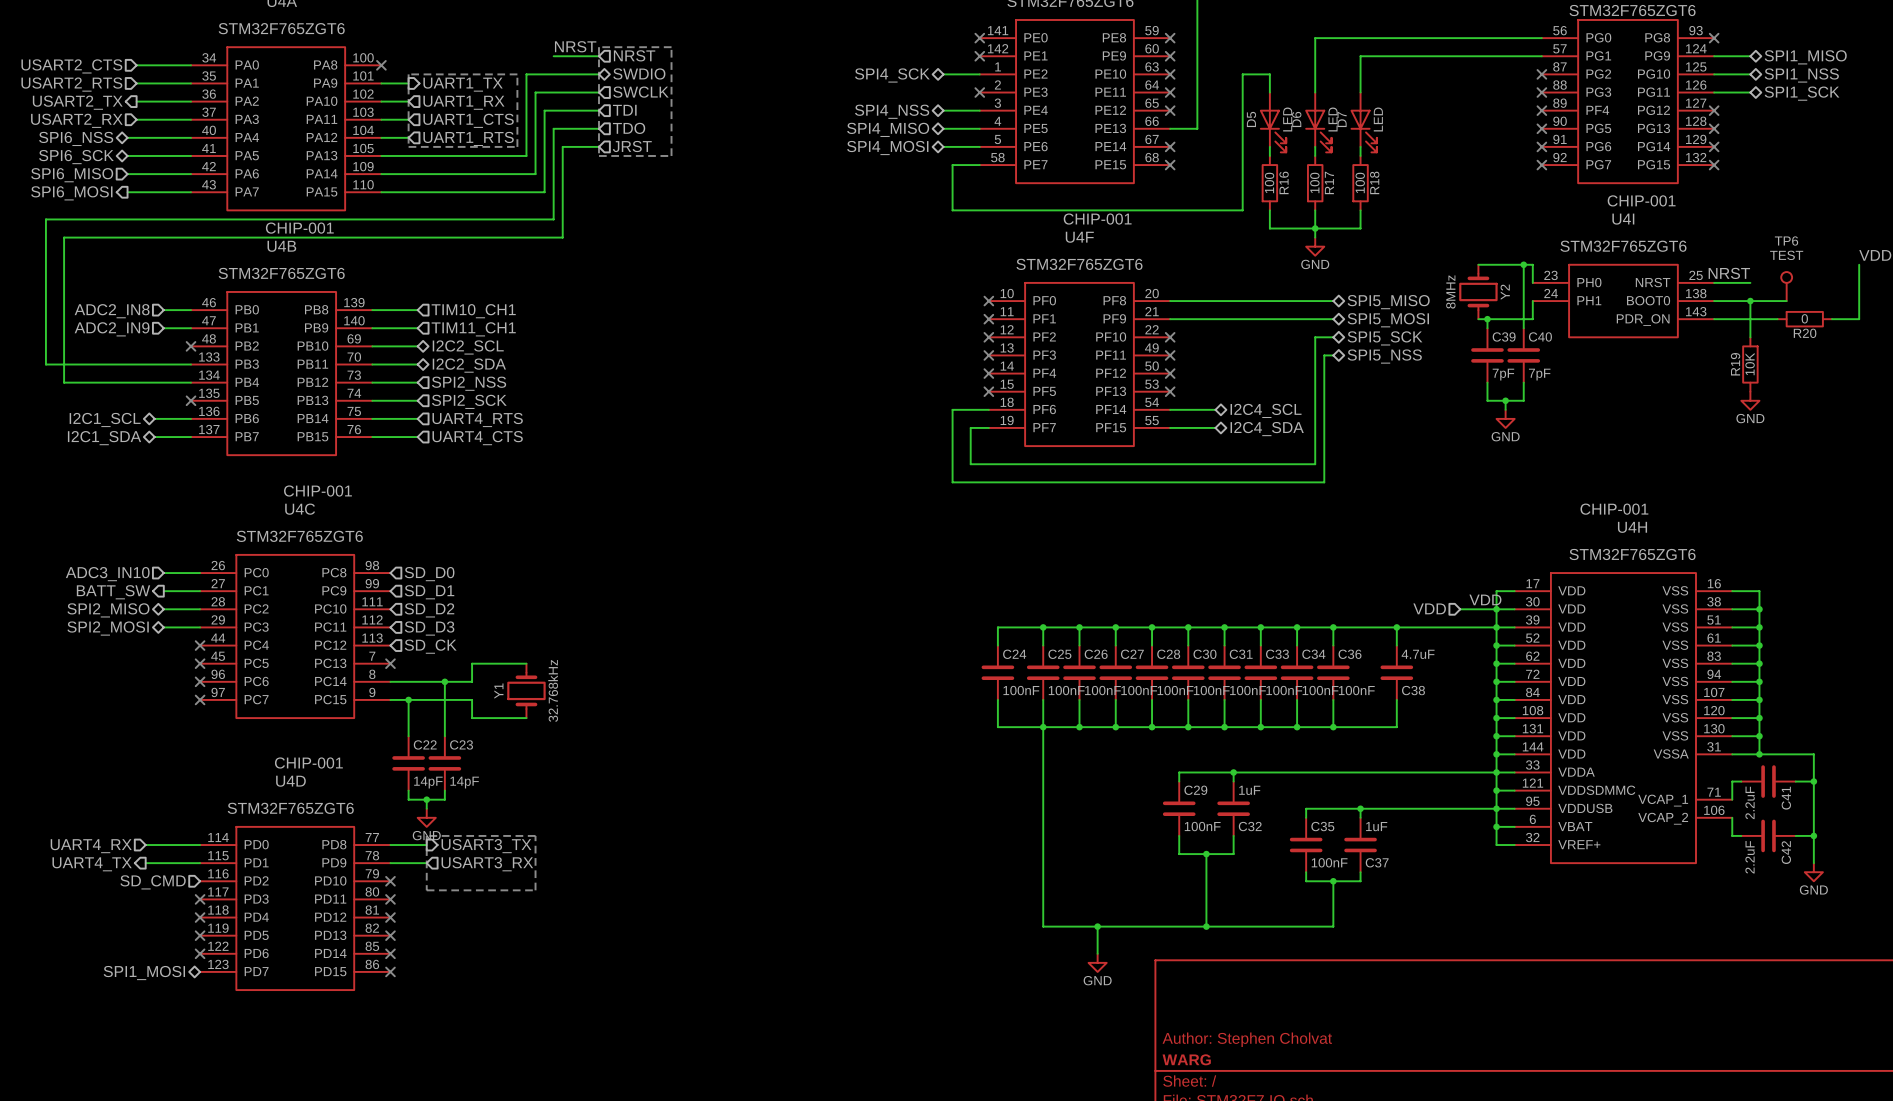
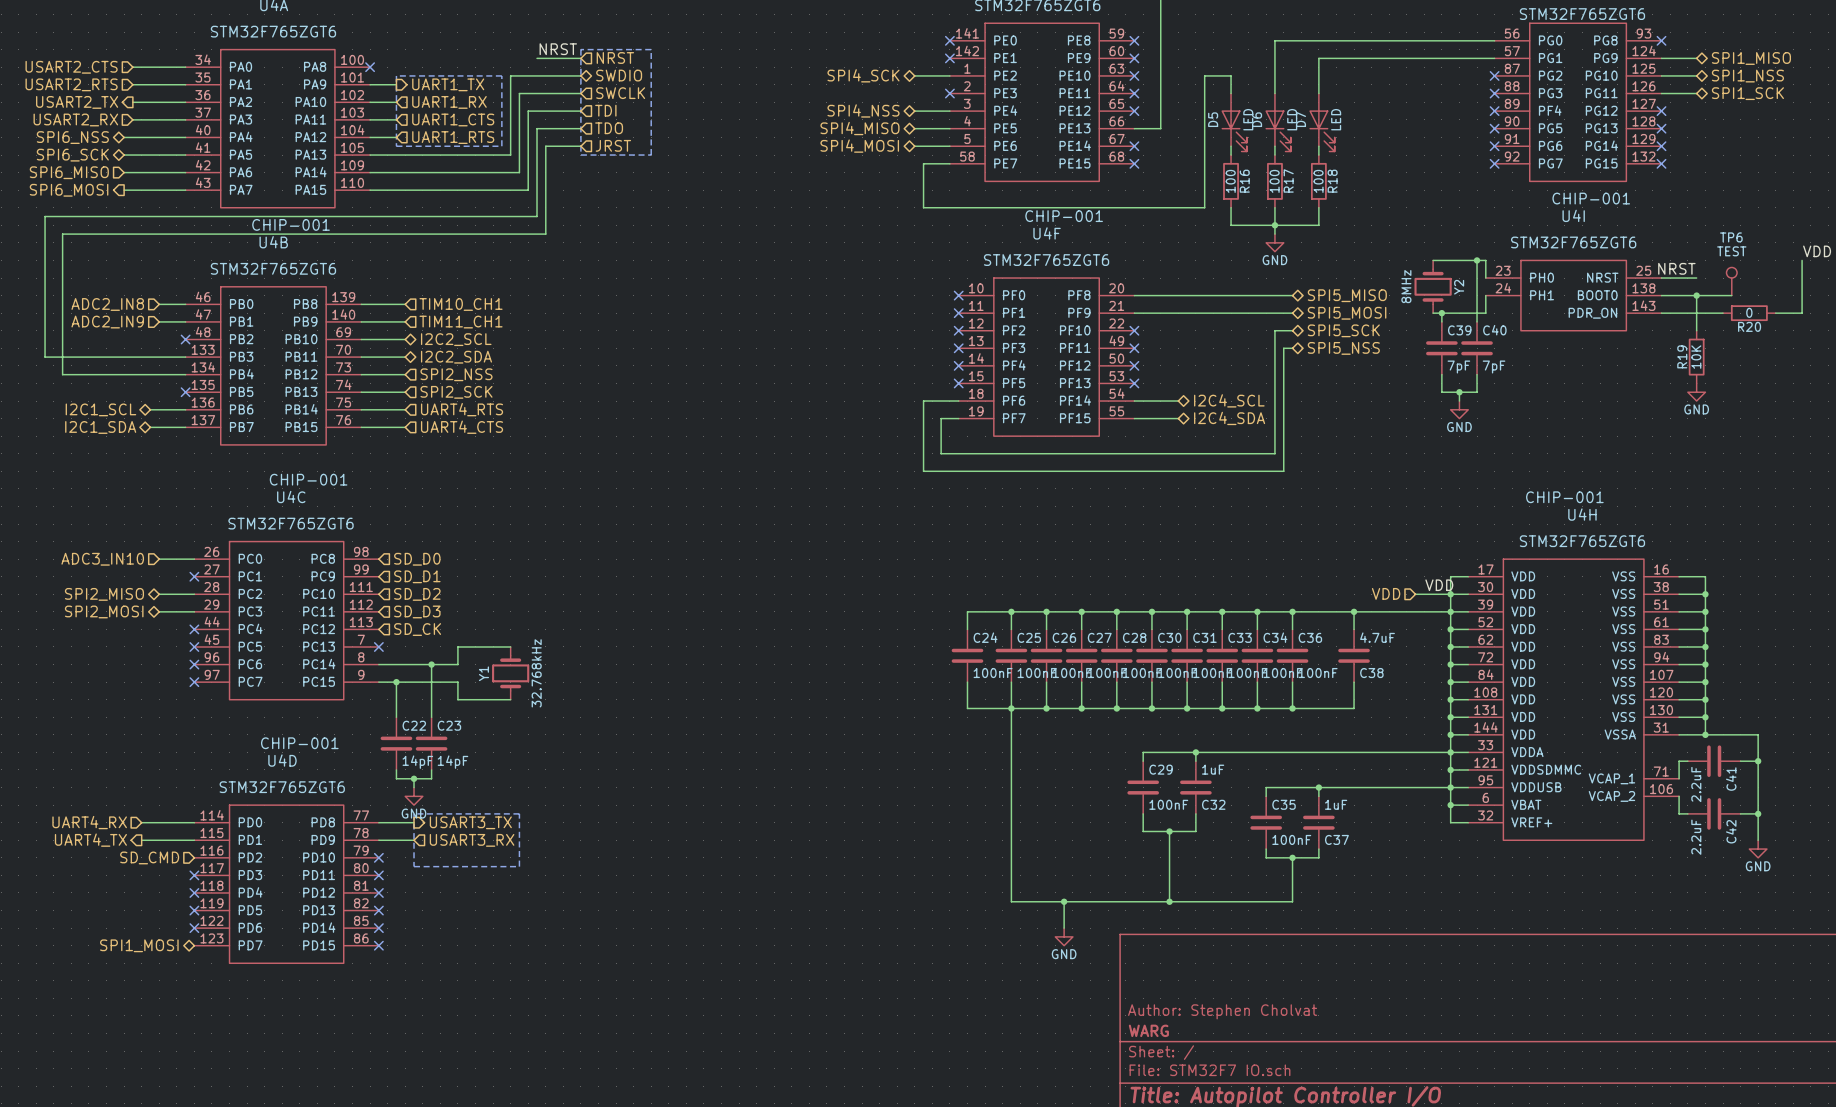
wire: (163, 591) (200, 591) -> none
no-connect mark: none -> (194, 576)
hierarchical label: BATT_SW (113, 592) -> none

